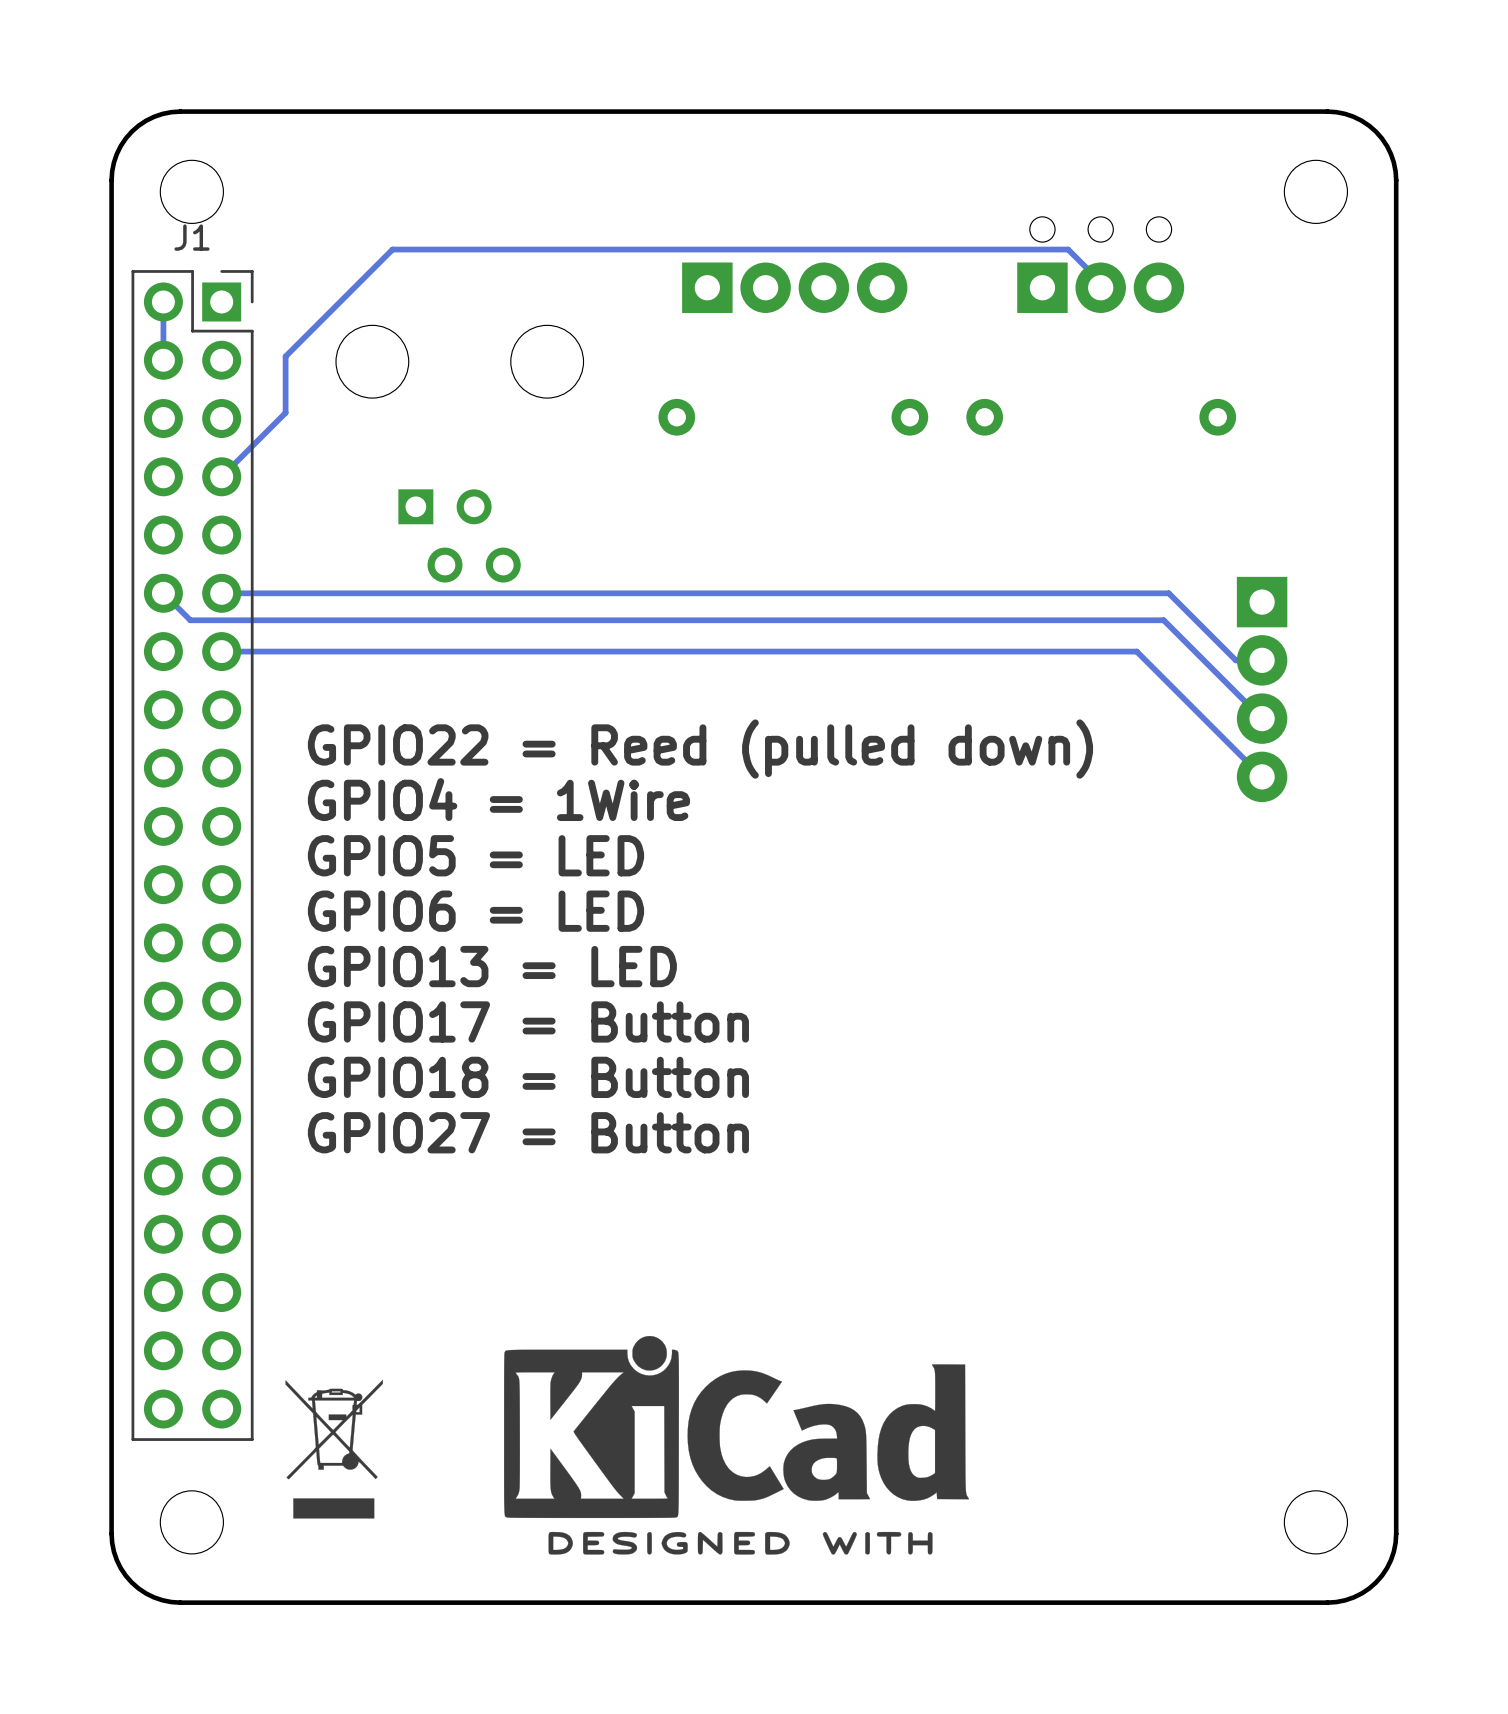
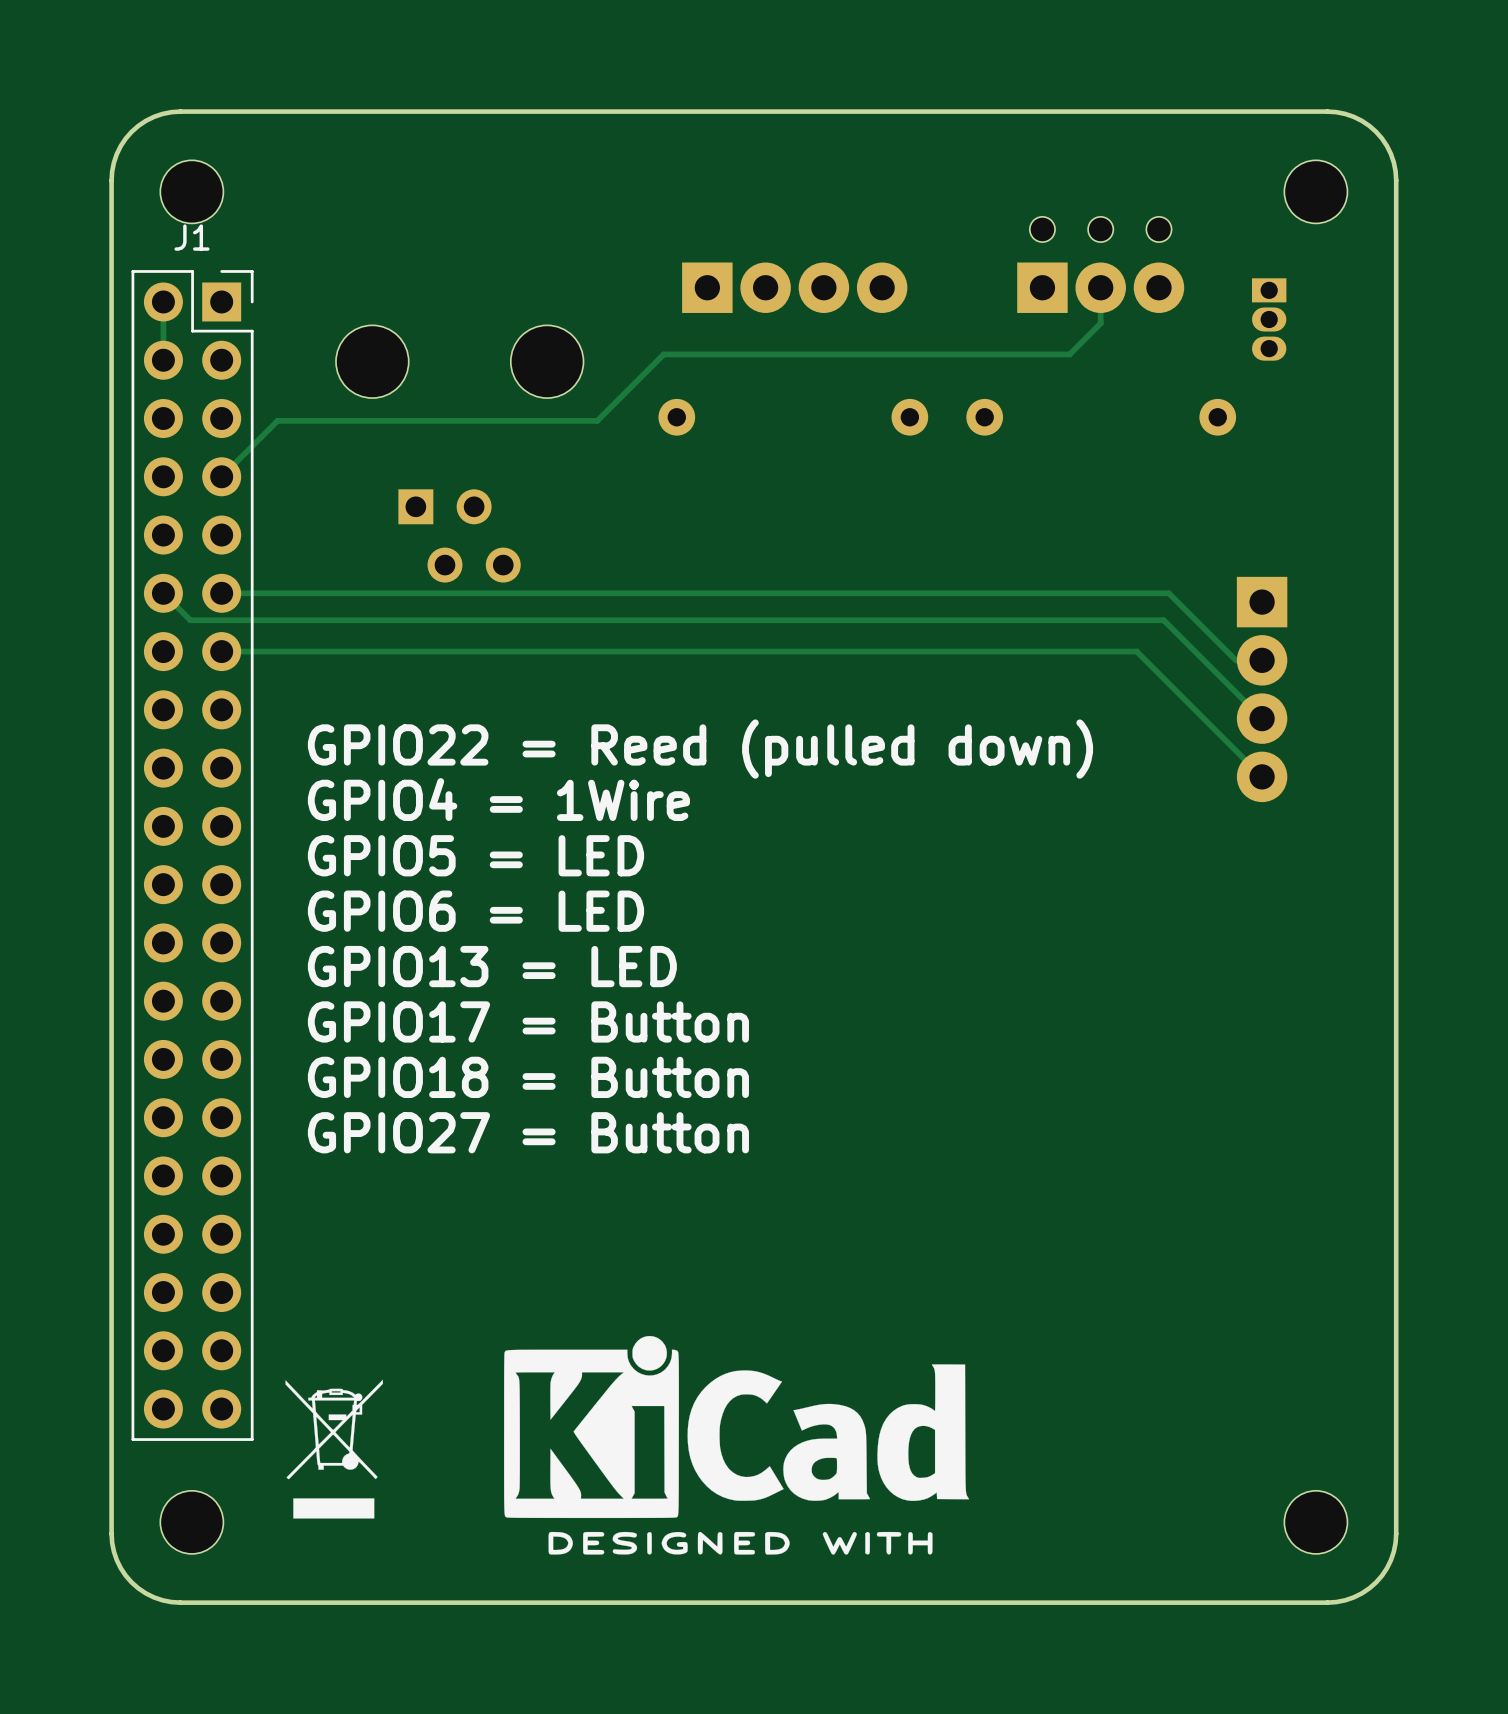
track: (1100, 287) (1100, 282) (1068, 249) (392, 249) (285, 356) (285, 412) (277, 420) -> (1100, 287) (1100, 323) (1069, 354) (663, 354) (597, 420) (277, 420)
part: none -> (1269, 319)

